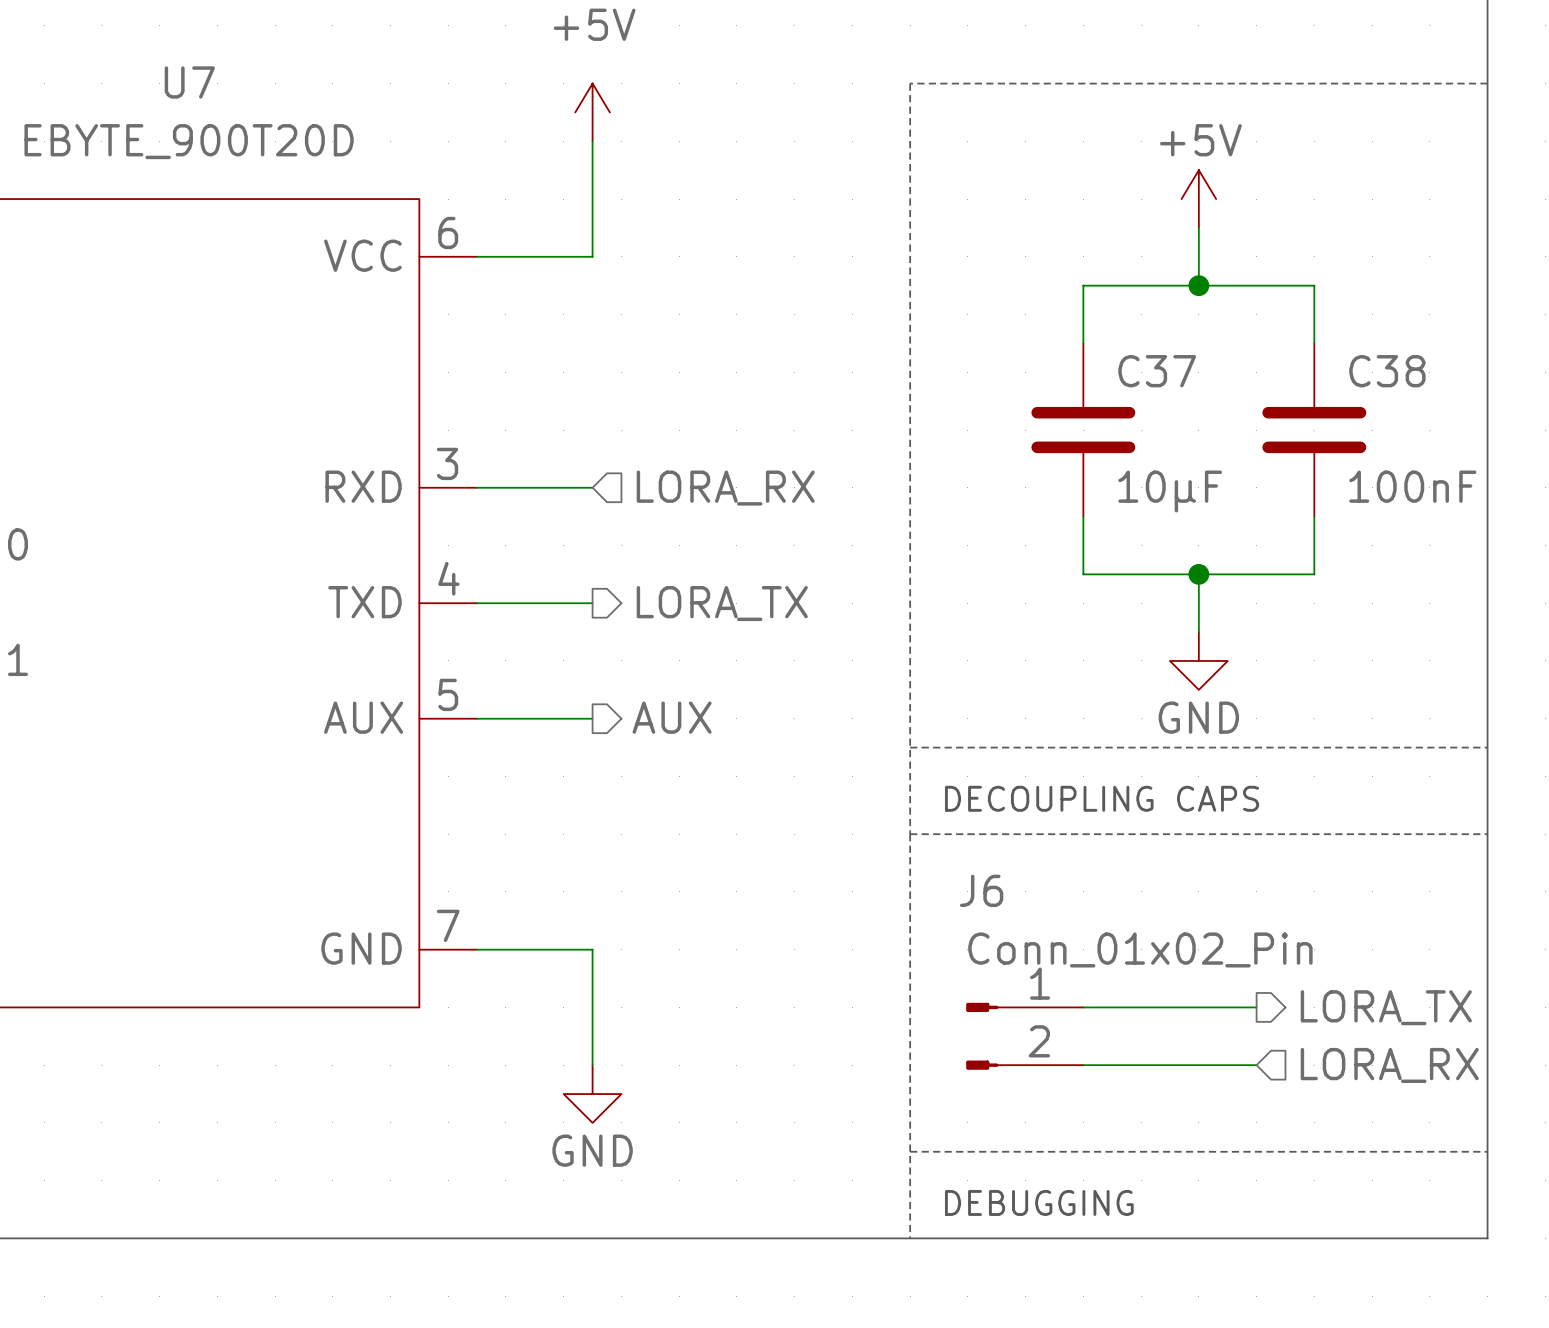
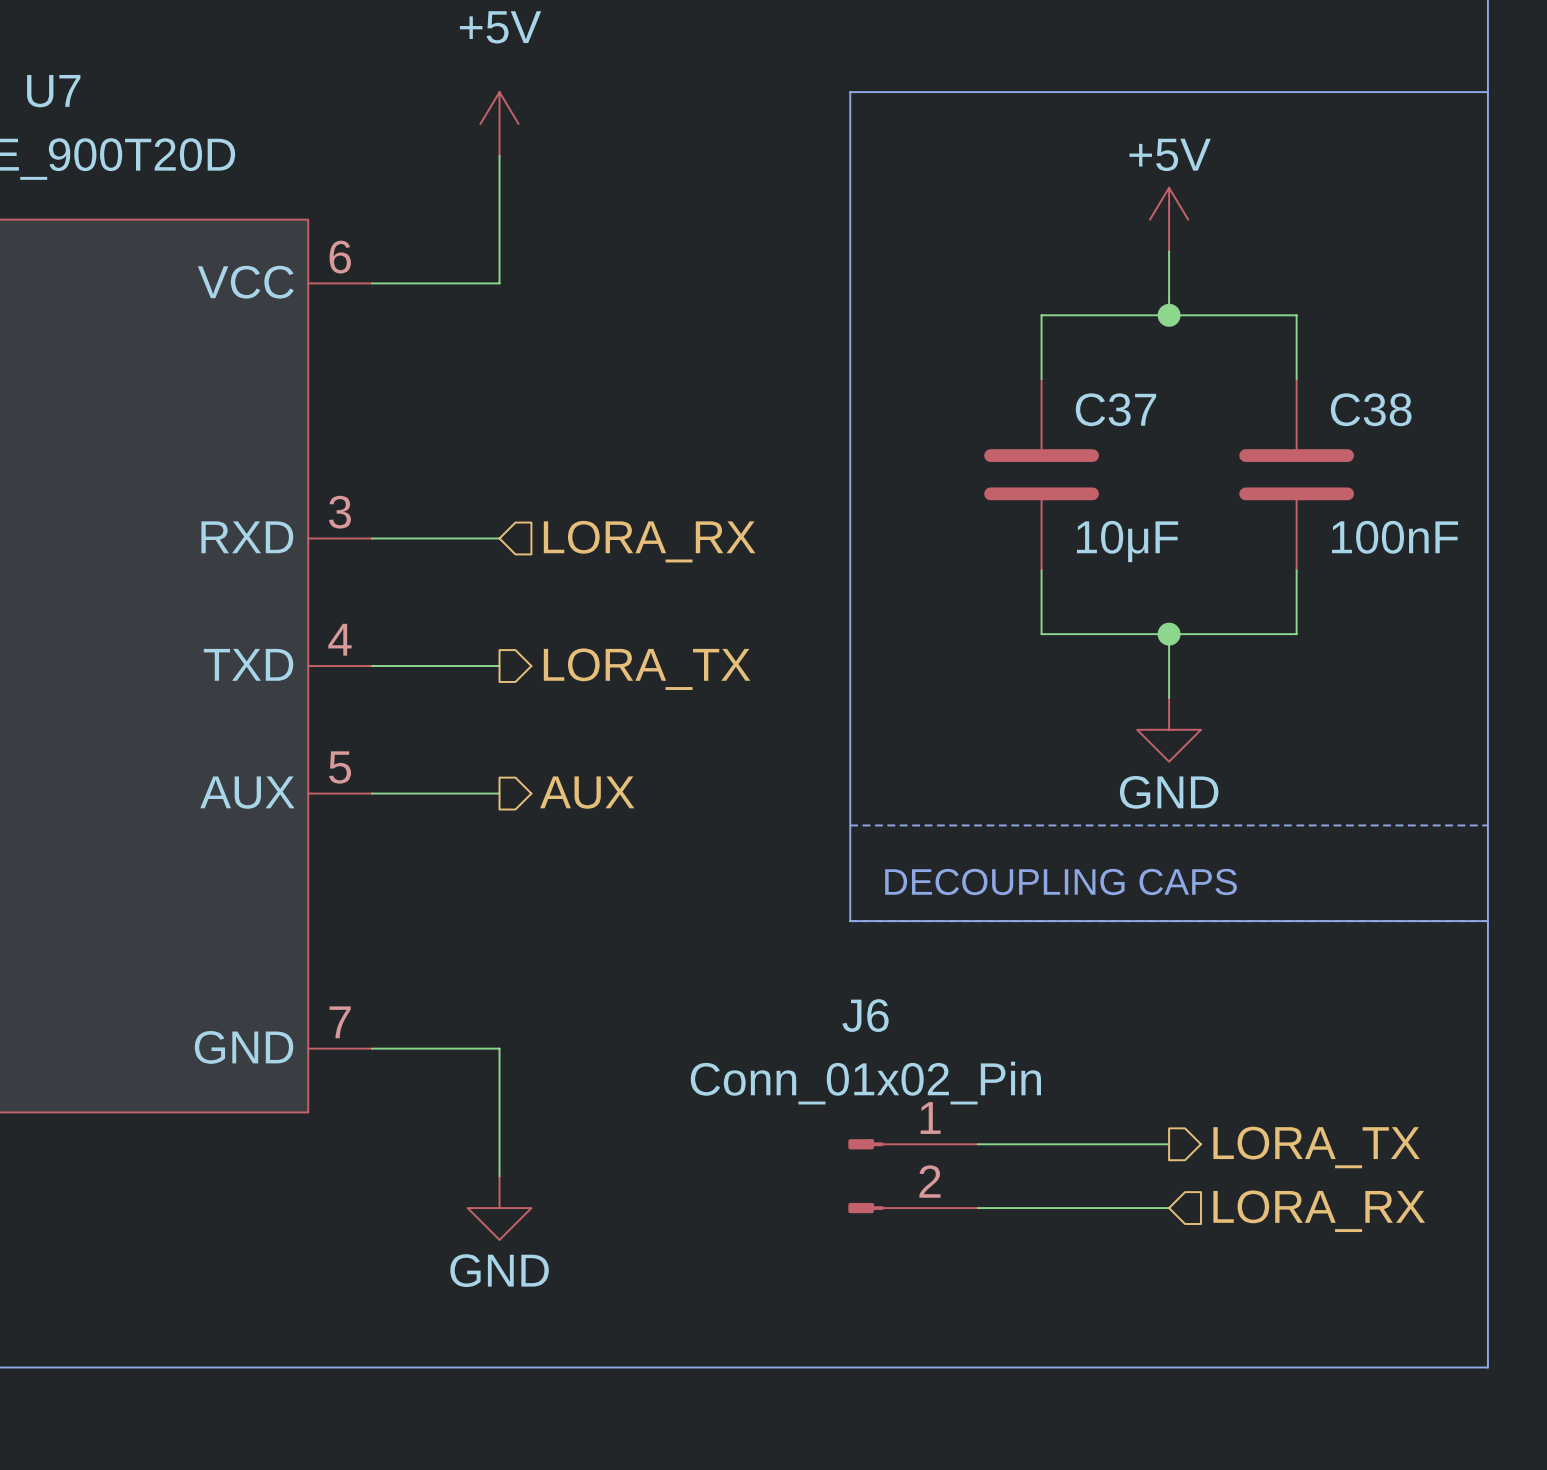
line: (1487, 83) (910, 83) (910, 1238) -> (1487, 92) (850, 92) (850, 921) (1487, 921)
J6 value position: Conn_01x02_Pin (1140, 949) -> Conn_01x02_Pin (865, 1083)
wire: (1083, 1007) (1256, 1007) -> (977, 1208) (1169, 1208)
hierarchical label position: LORA_TX (1386, 1007) -> LORA_TX (1316, 1147)
J6 position: (1024, 1036) -> (913, 1176)
wire: (1083, 1065) (1256, 1065) -> (977, 1144) (1169, 1144)
hierarchical label position: LORA_RX (1389, 1065) -> LORA_RX (1319, 1211)
line: (910, 1151) (1487, 1151) -> none
text: DEBUGGING (1039, 1202) -> none

